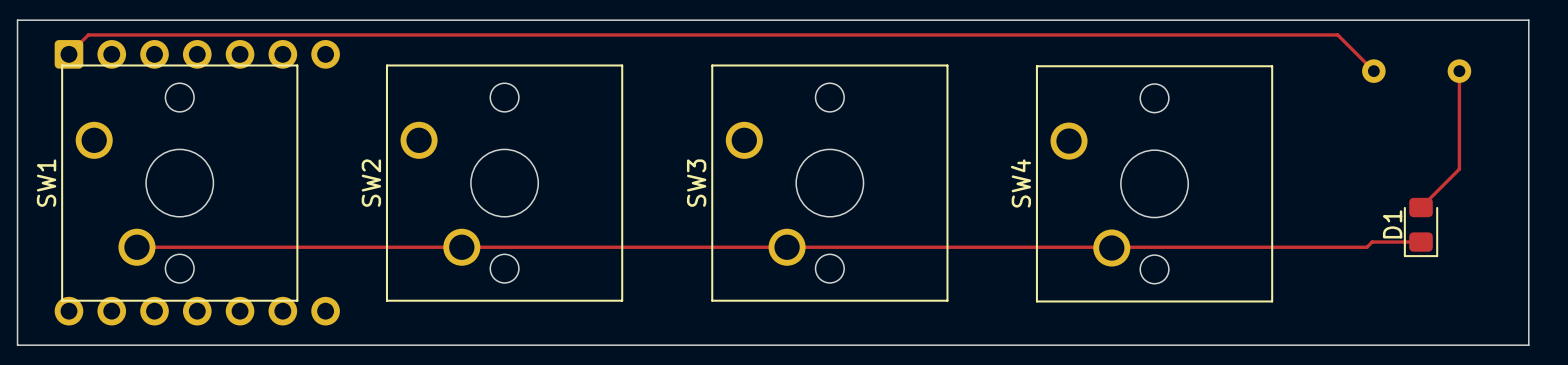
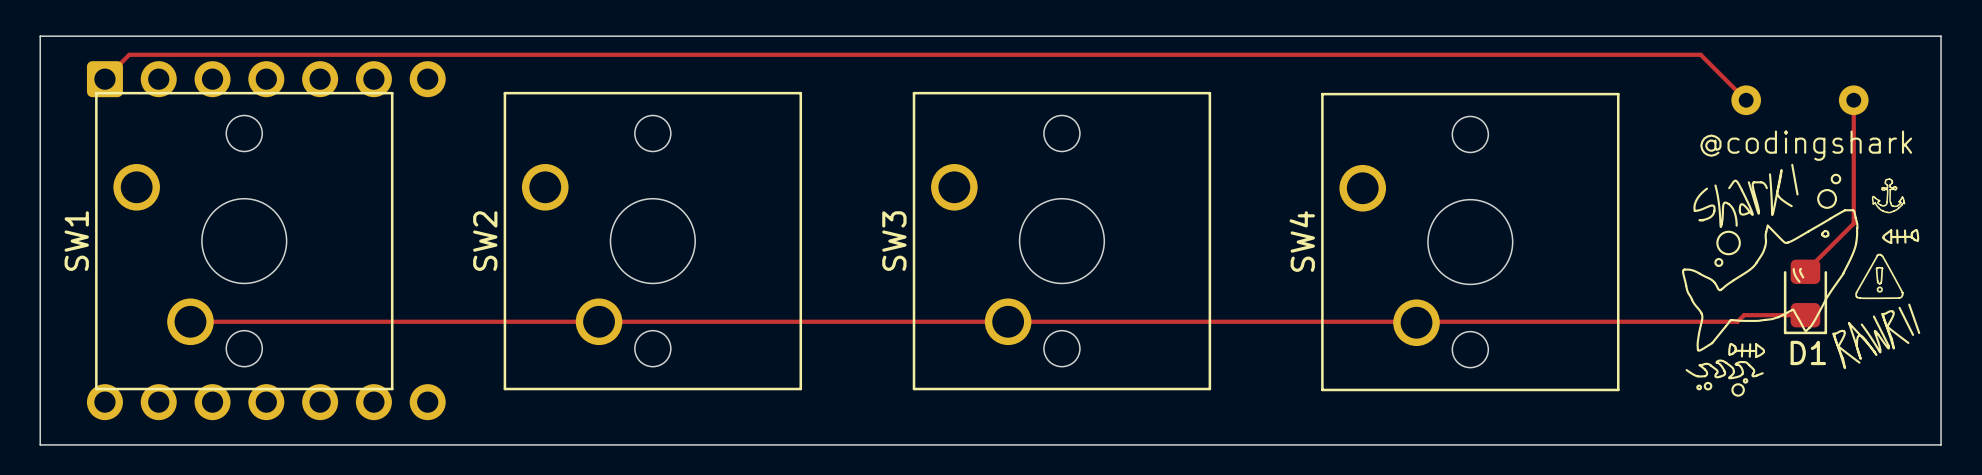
text: none -> @codingshark (1806, 145)
line: none -> (1792, 164) (1797, 194)
drawing: none -> [1817, 173, 1842, 209]
line: none -> (1770, 174) (1772, 214) (1781, 170) (1777, 194) (1791, 206)
line: none -> (1889, 179) (1892, 181) (1890, 187) (1896, 187) (1895, 189) (1890, 189) (1891, 205) (1897, 205) (1902, 196) (1904, 203) (1888, 212) (1880, 209) (1875, 202) (1873, 203) (1872, 197) (1879, 200) (1877, 202) (1880, 204) (1886, 204) (1887, 190) (1882, 188) (1887, 188) (1885, 180) (1889, 179)
line: none -> (1748, 182) (1758, 213) (1752, 183) (1762, 182) (1766, 188)
line: none -> (1715, 185) (1720, 226) (1725, 202) (1733, 209) (1736, 225)
line: none -> (1706, 188) (1698, 197) (1694, 206) (1694, 210) (1714, 206) (1712, 214) (1708, 218) (1703, 219) (1700, 220) (1699, 220) (1699, 220) (1703, 220)
line: none -> (1729, 188) (1734, 181) (1737, 181) (1752, 214) (1749, 211)
line: none -> (1845, 210) (1786, 242) (1767, 225) (1764, 248) (1755, 263) (1720, 290) (1710, 278) (1693, 270) (1683, 269) (1687, 291) (1702, 315) (1698, 350) (1712, 343) (1731, 320) (1772, 319) (1793, 309) (1805, 330) (1809, 327) (1843, 273) (1855, 247) (1857, 226) (1854, 211) (1845, 210)
line: none -> (1749, 211) (1743, 204) (1740, 204) (1741, 214) (1749, 211)
drawing: none -> [1714, 230, 1741, 267]
line: none -> (1891, 230) (1883, 237) (1891, 242) (1891, 240) (1891, 230)
line: none -> (1897, 230) (1897, 242)
line: none -> (1905, 230) (1905, 242)
line: none -> (1824, 230) (1822, 234) (1825, 236) (1828, 234) (1824, 230)
line: none -> (1911, 236) (1891, 237)
line: none -> (1911, 236) (1911, 232) (1916, 230) (1917, 240) (1911, 236)
line: none -> (1878, 254) (1856, 291) (1856, 296) (1862, 298) (1900, 297) (1902, 292) (1882, 256) (1878, 254)
line: none -> (1877, 267) (1882, 268) (1879, 283) (1877, 279) (1877, 267)
line: none -> (1793, 269) (1799, 281)
line: none -> (1801, 269) (1800, 271) (1803, 277)
drawing: none -> [1876, 286, 1883, 293]
D1 name rotation: 0° (1392, 224) -> 90° clockwise (1808, 352)
D1 name position: D1 (1392, 224) -> D1 (1808, 352)
line: none -> (1909, 304) (1919, 333)
line: none -> (1899, 307) (1913, 334)
line: none -> (1882, 313) (1893, 348) (1883, 316) (1883, 314) (1889, 311) (1893, 313) (1887, 326) (1908, 342)
line: none -> (1873, 316) (1888, 348) (1874, 330) (1880, 352) (1861, 324)
line: none -> (1849, 323) (1856, 346) (1857, 349) (1859, 354) (1860, 358) (1857, 350) (1857, 347) (1856, 346) (1856, 346) (1856, 345) (1859, 335) (1860, 335) (1861, 335) (1863, 337) (1870, 346) (1871, 348) (1872, 349) (1873, 351) (1876, 354) (1868, 344) (1864, 340) (1862, 337) (1860, 335) (1849, 323)
line: none -> (1833, 333) (1844, 368) (1834, 335) (1834, 333) (1840, 331) (1844, 333) (1838, 346) (1859, 362)
line: none -> (1742, 344) (1741, 356)
line: none -> (1750, 344) (1749, 356)
line: none -> (1756, 344) (1756, 344) (1756, 356) (1763, 351) (1756, 344)
line: none -> (1735, 350) (1755, 351)
line: none -> (1735, 350) (1735, 350) (1735, 350) (1735, 350) (1735, 351) (1734, 351) (1734, 352) (1733, 353) (1732, 353) (1729, 354) (1730, 344) (1735, 346) (1735, 350)
line: none -> (1686, 370) (1696, 375) (1705, 376) (1706, 371) (1699, 365) (1707, 363) (1717, 370) (1715, 376) (1719, 376) (1725, 373) (1721, 365) (1716, 362) (1720, 360) (1733, 368) (1733, 373) (1729, 378) (1742, 374) (1741, 367) (1735, 364) (1740, 362) (1746, 362) (1752, 368) (1752, 376) (1762, 373)
drawing: none -> [1696, 378, 1749, 397]

